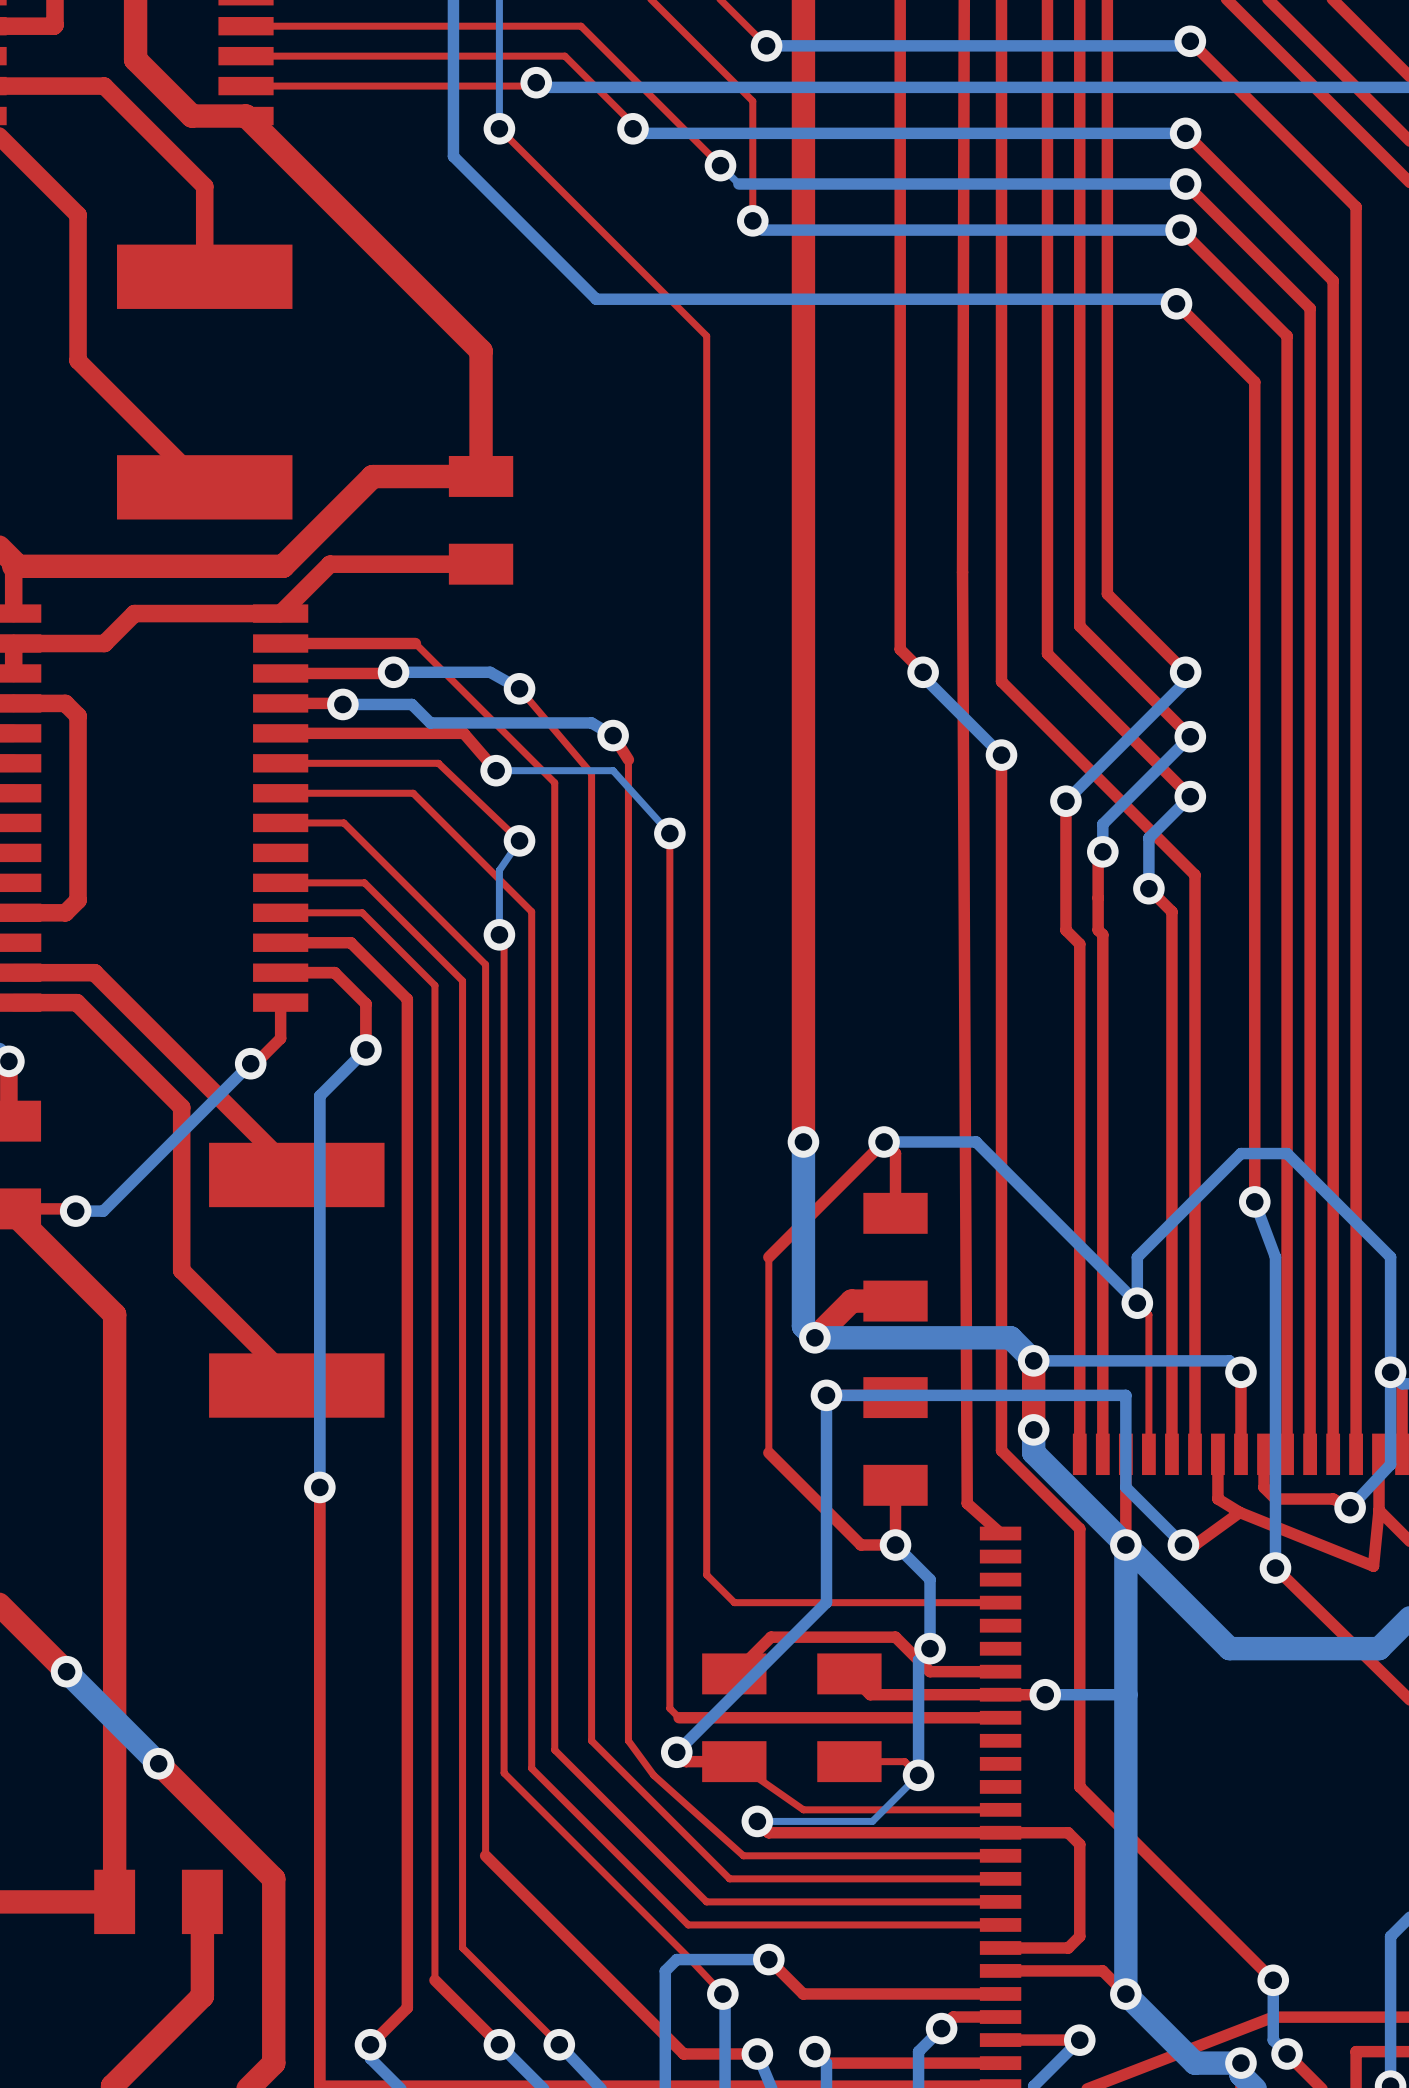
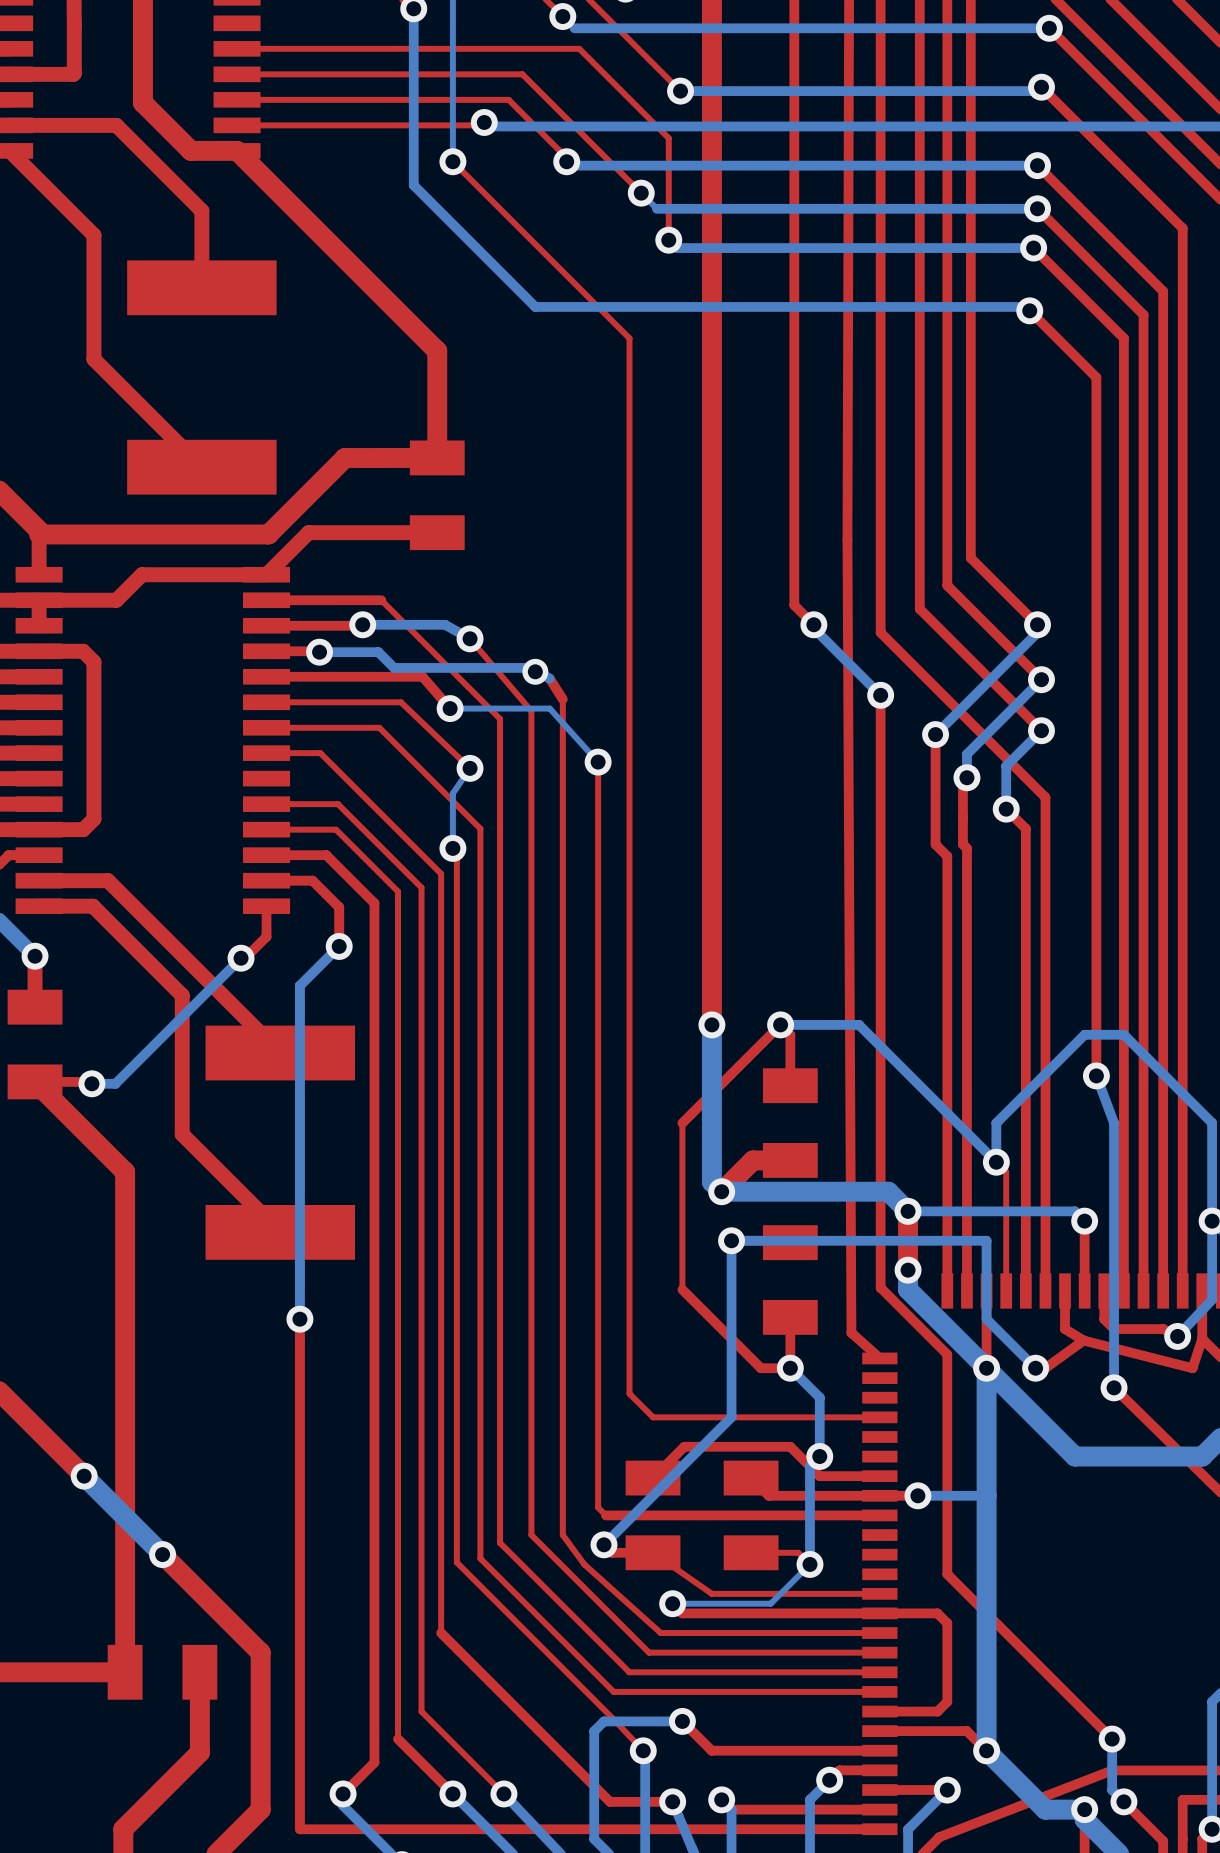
via position: (613, 735) -> (535, 671)
top track: (1379, 1510) (1373, 1566) (1239, 1512) -> (1202, 1338) (1192, 1368) (1083, 1340)

